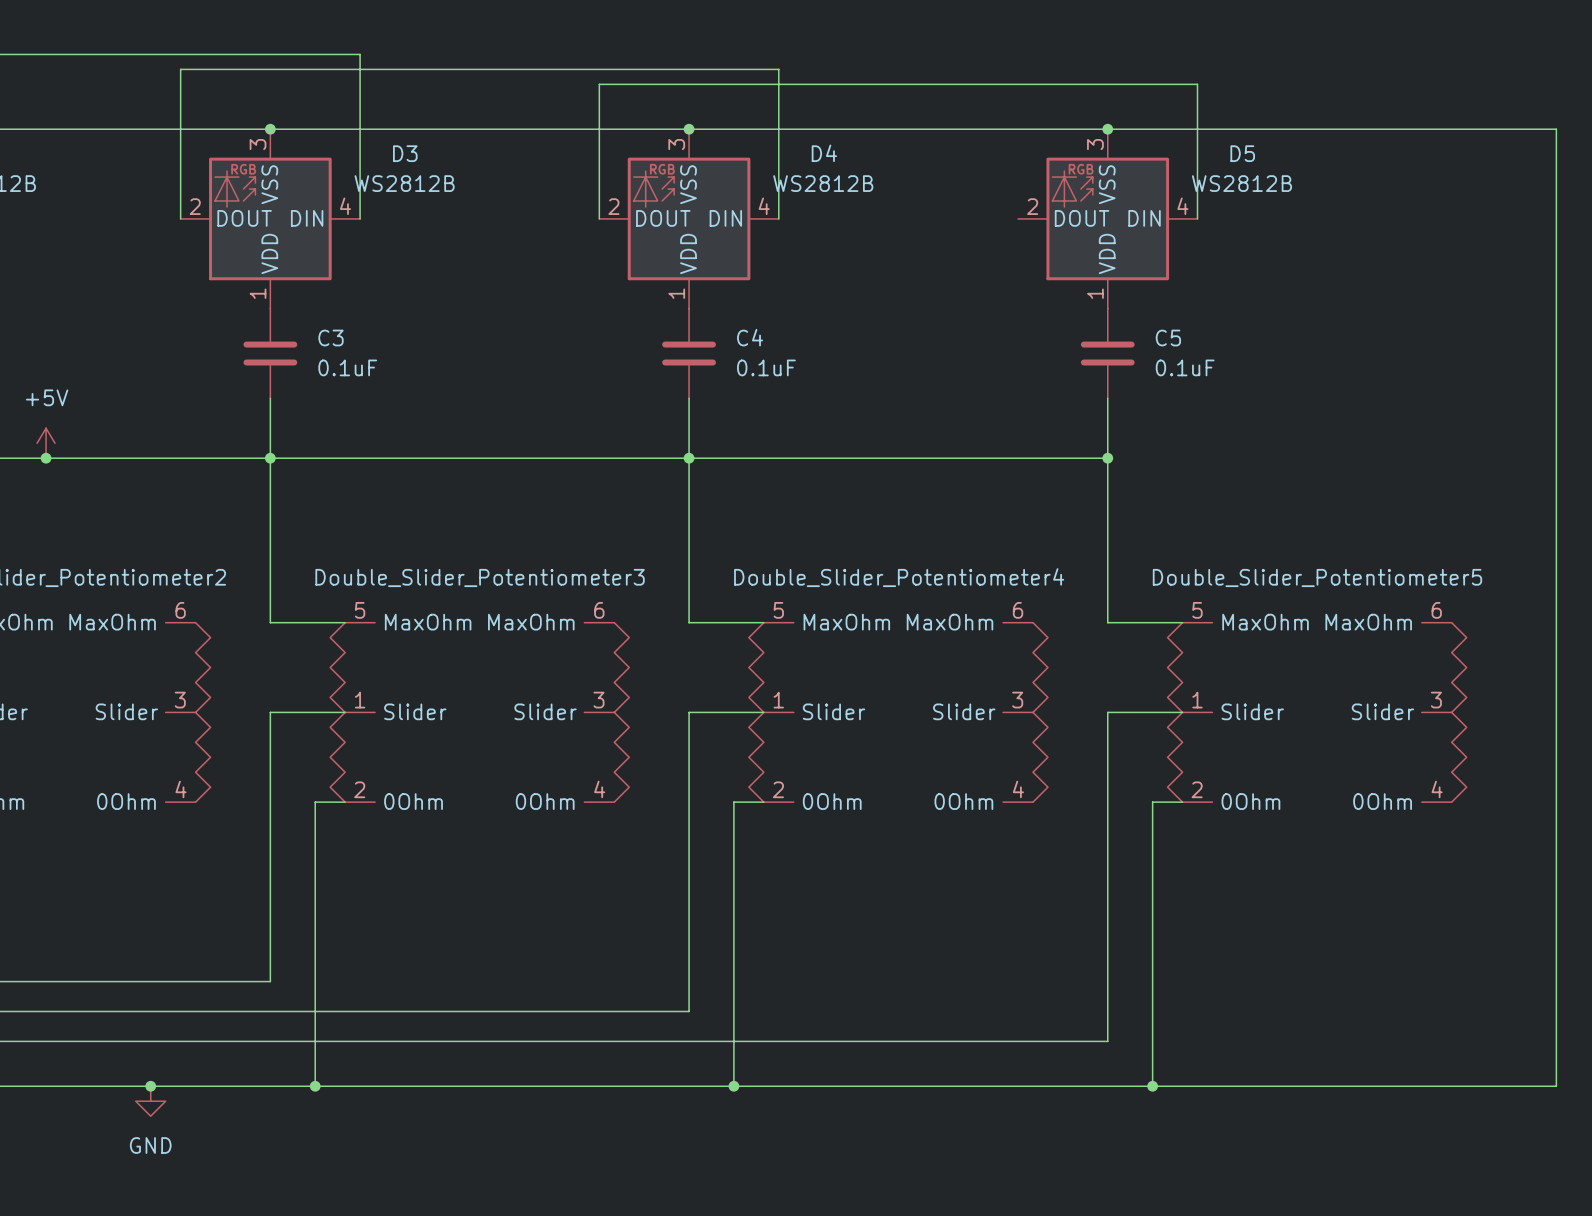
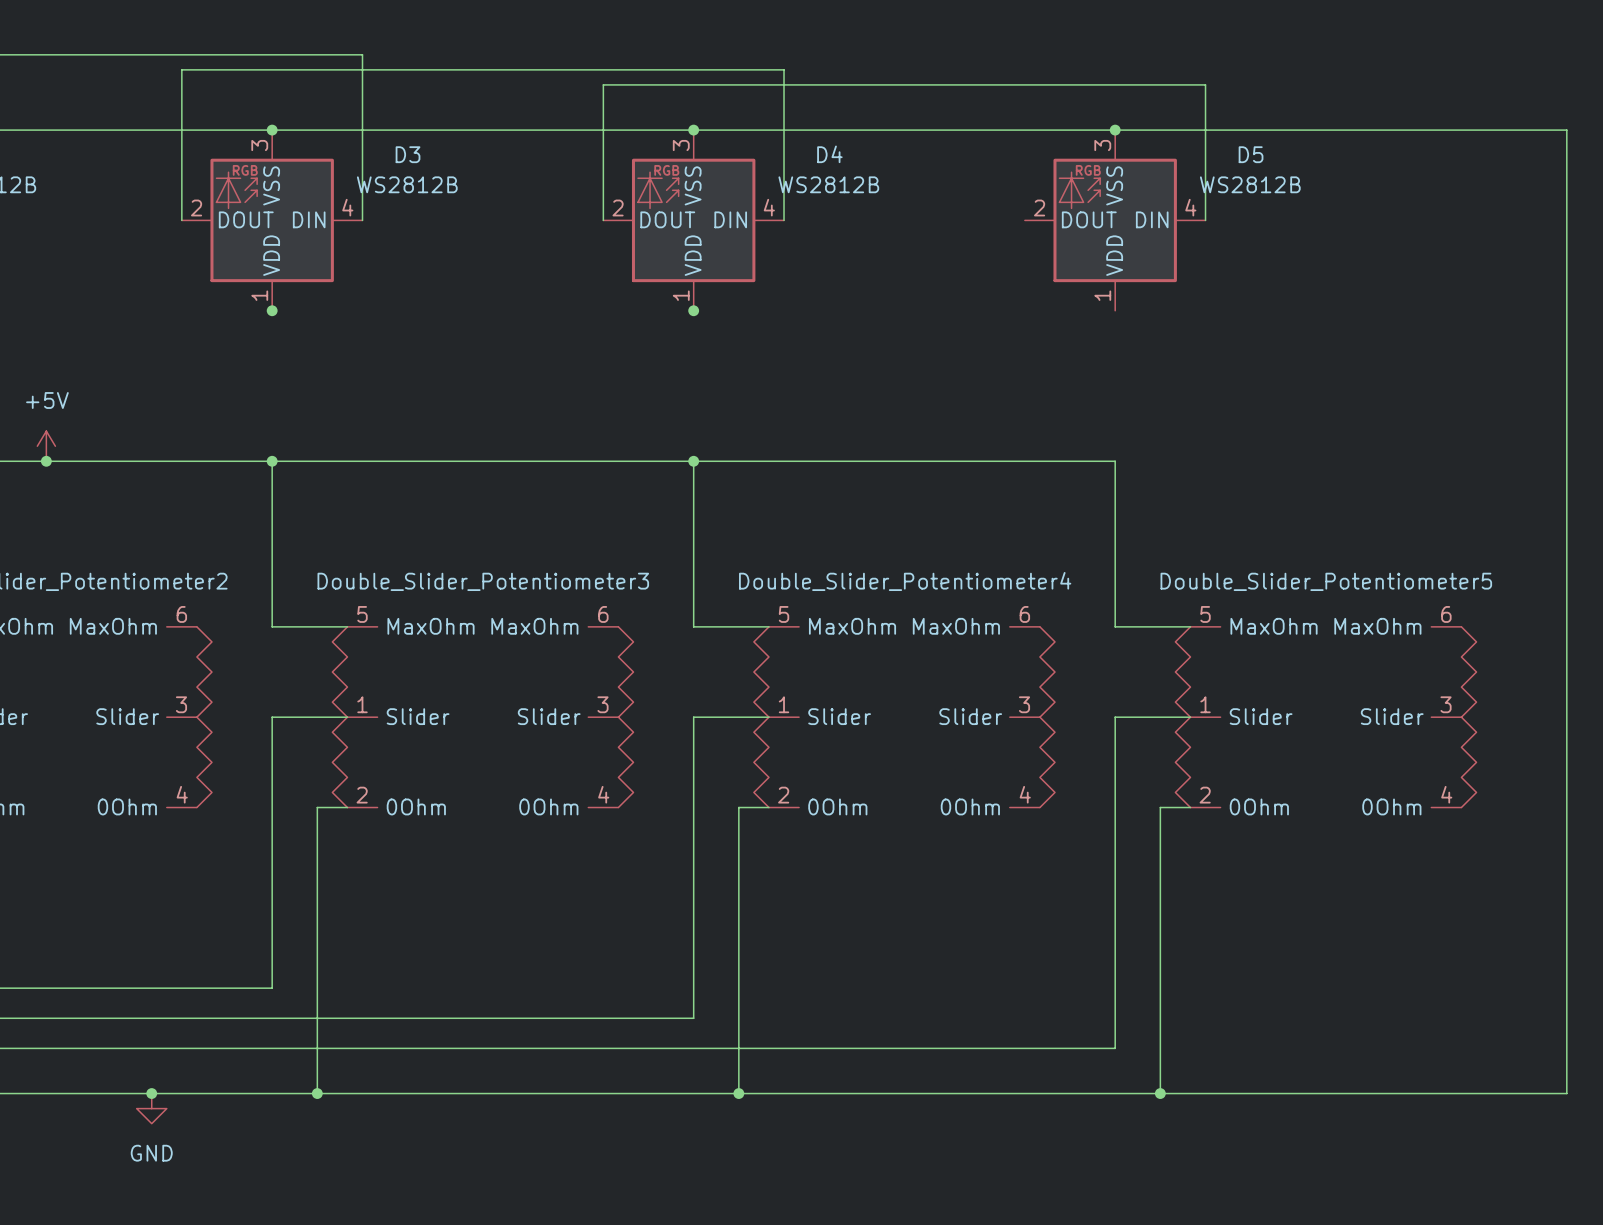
junction: none -> (272, 310)
junction: none -> (693, 310)
C3: 0.1uF (270, 353) -> none
C4: 0.1uF (689, 353) -> none
C5: 0.1uF (1107, 353) -> none
wire: (270, 398) (270, 458) -> none
wire: (689, 398) (689, 458) -> none
wire: (1107, 398) (1107, 458) -> none
junction: (1107, 458) -> none

